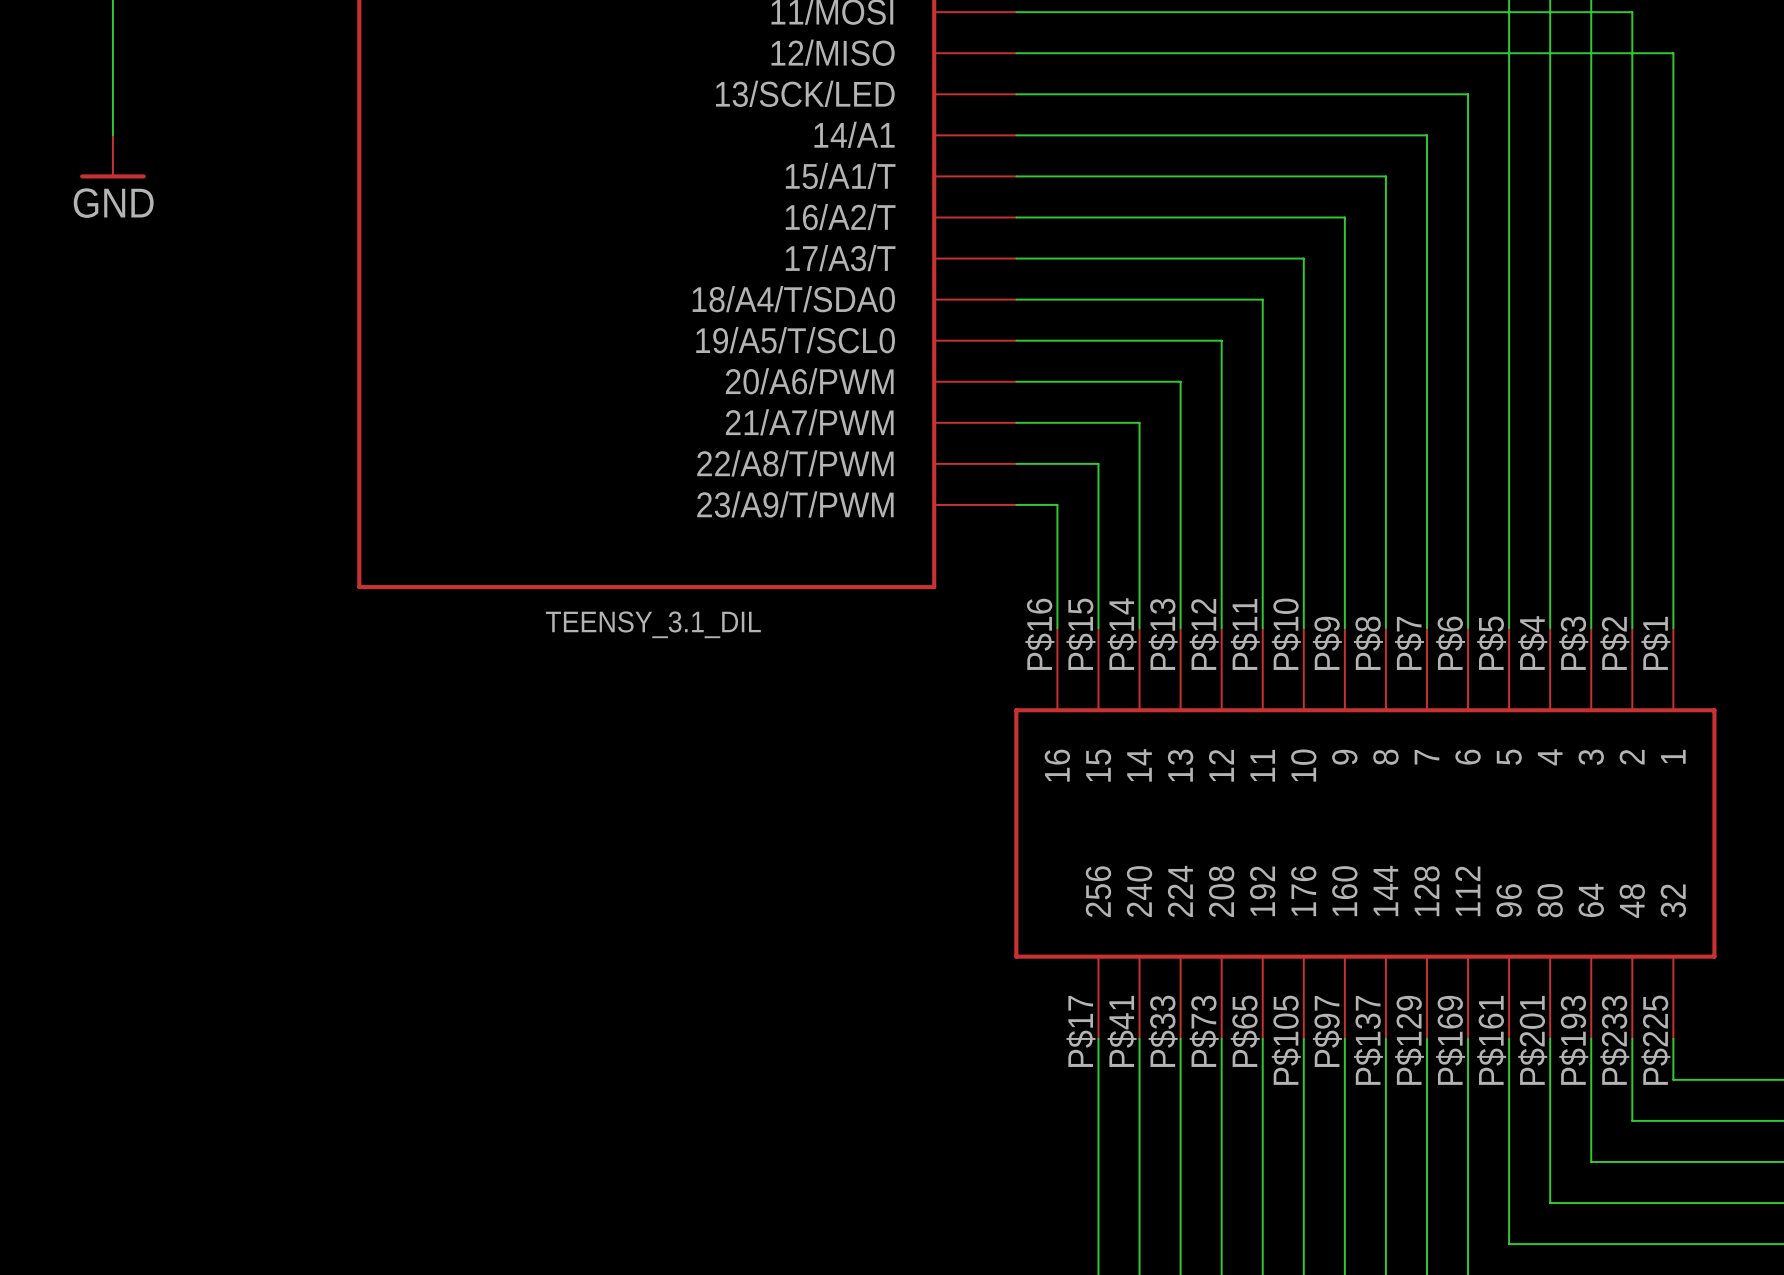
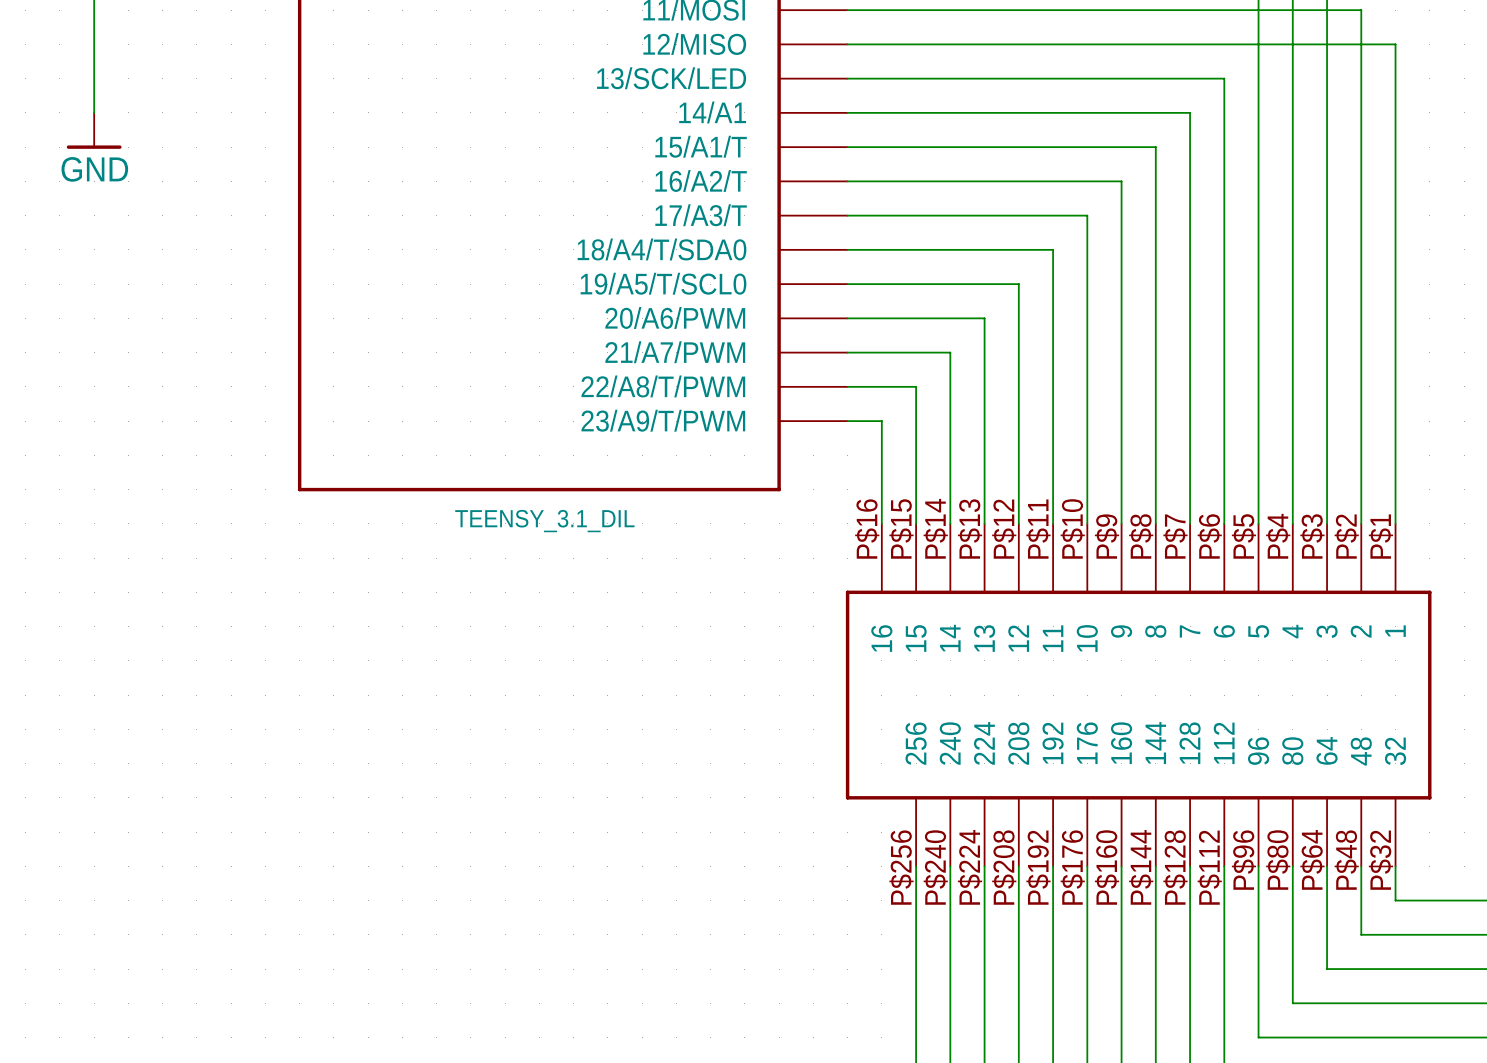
part symbol: [1014, 628, 1717, 1039] -> [845, 523, 1432, 867]

